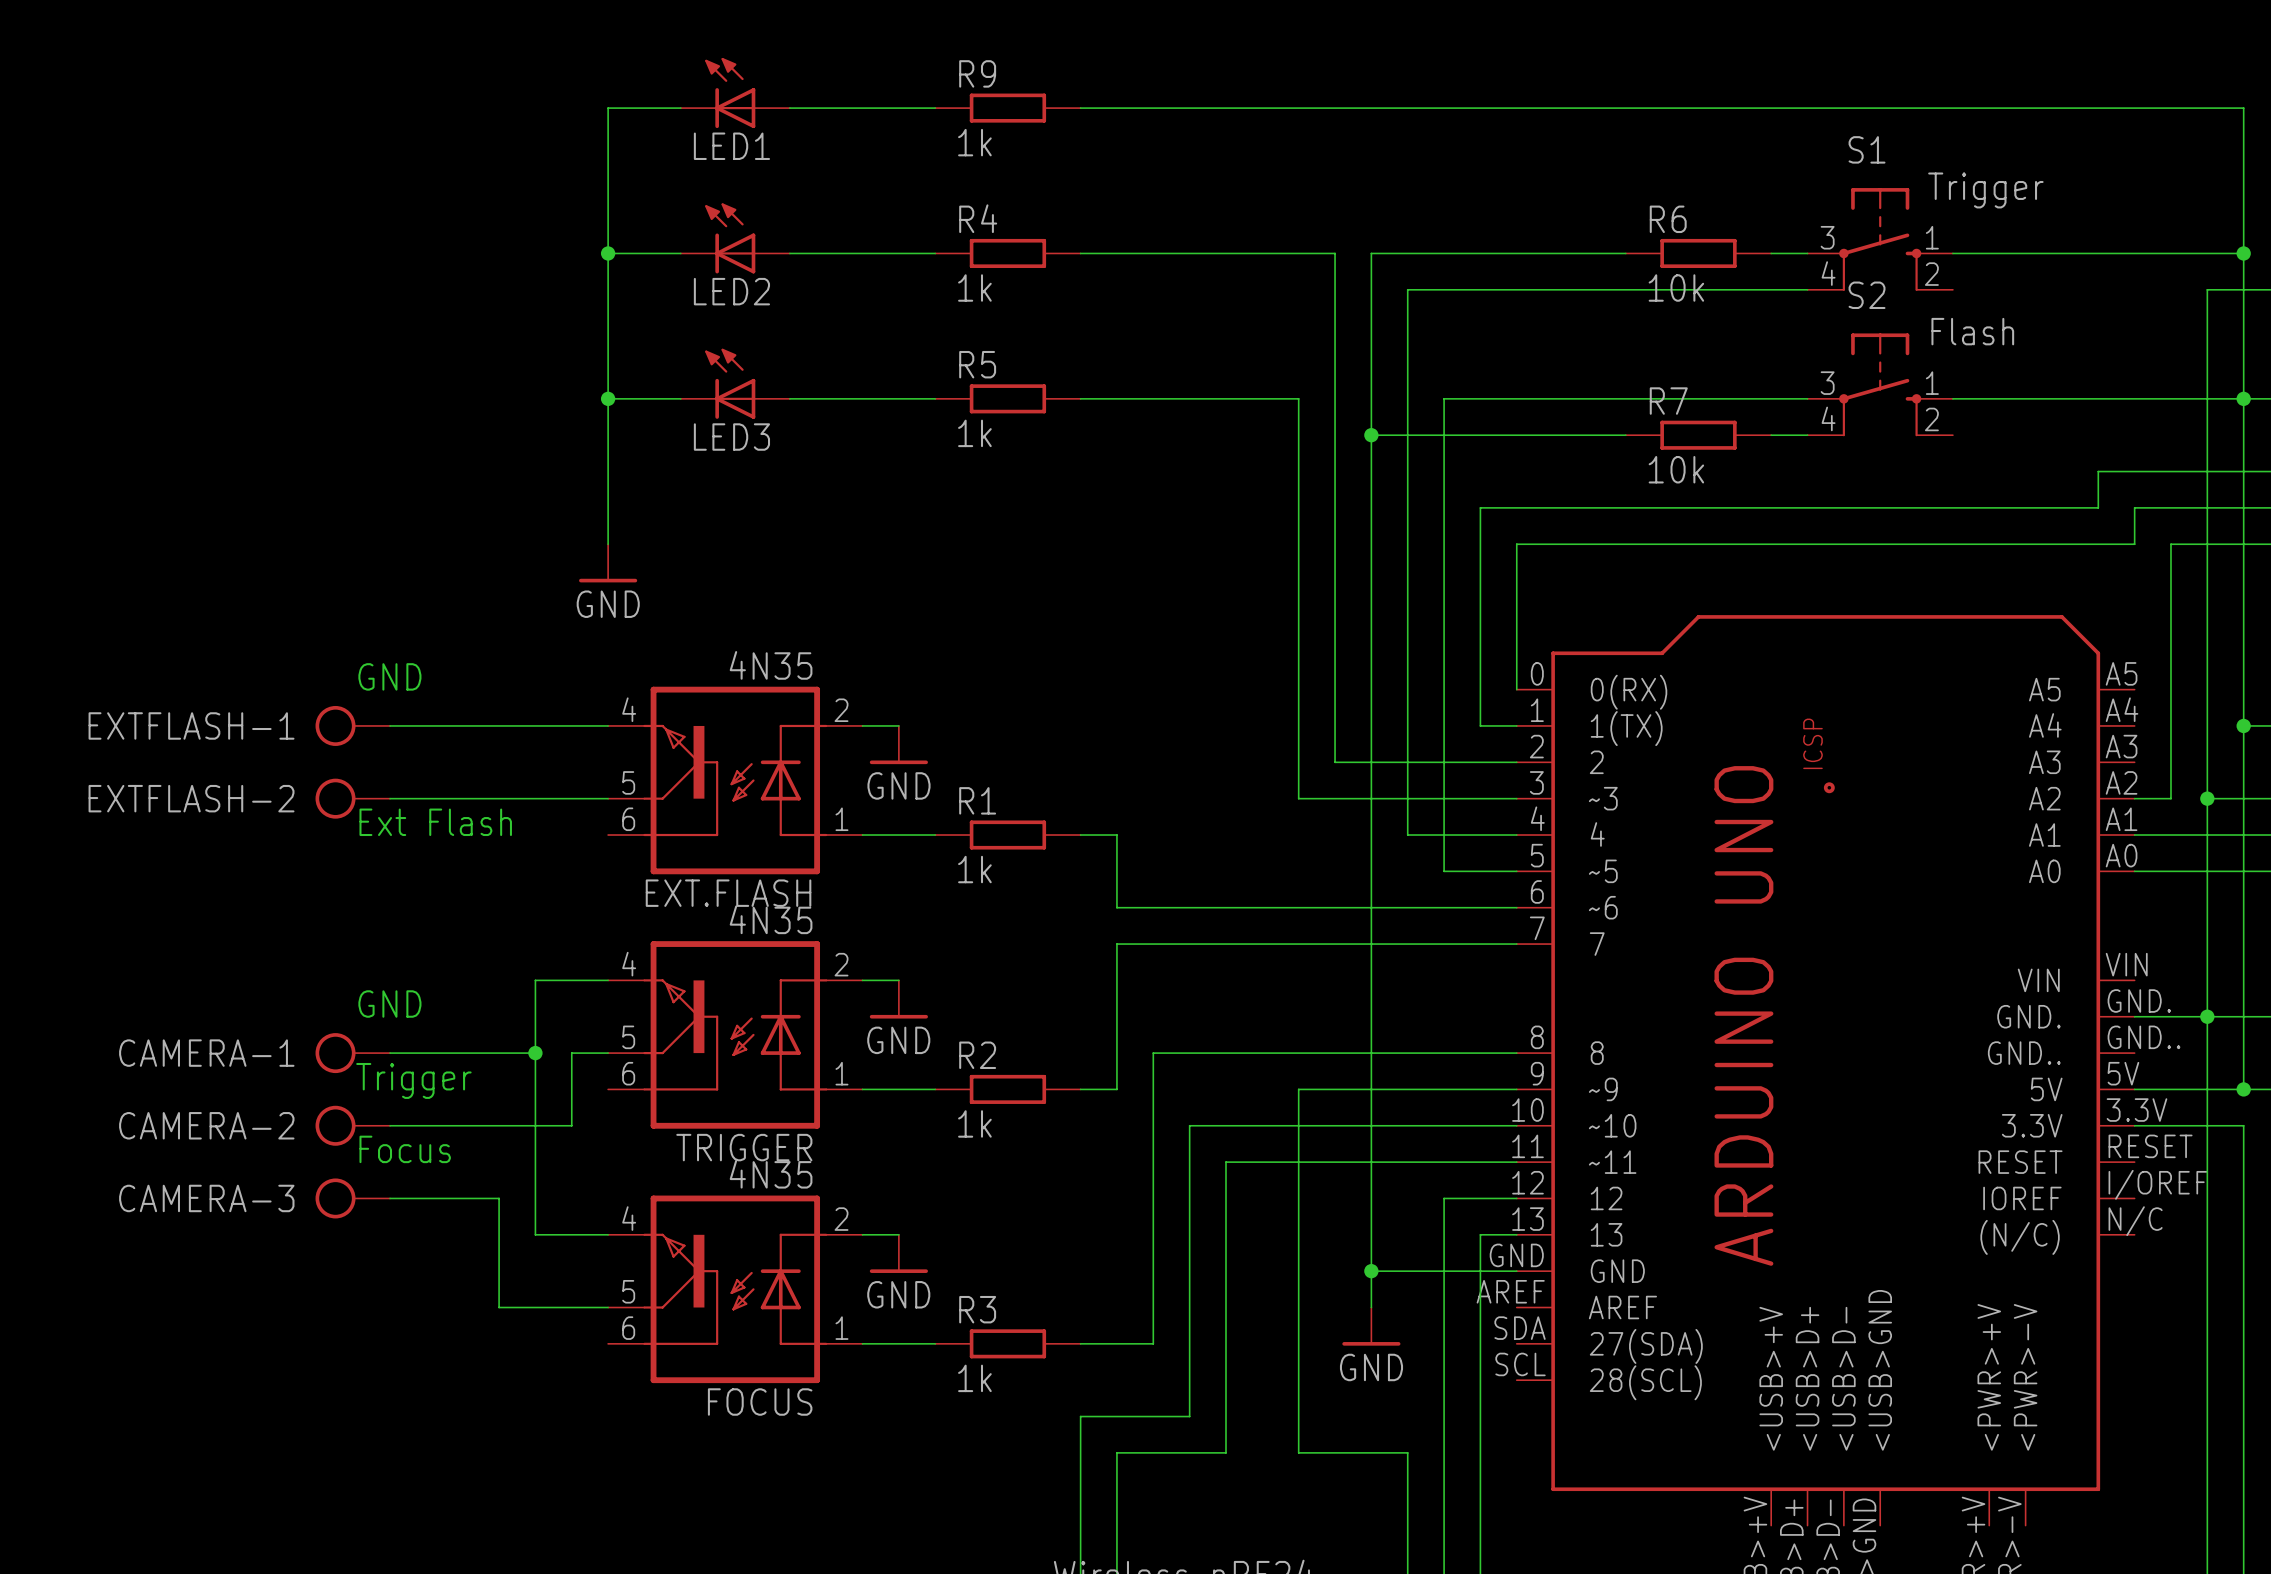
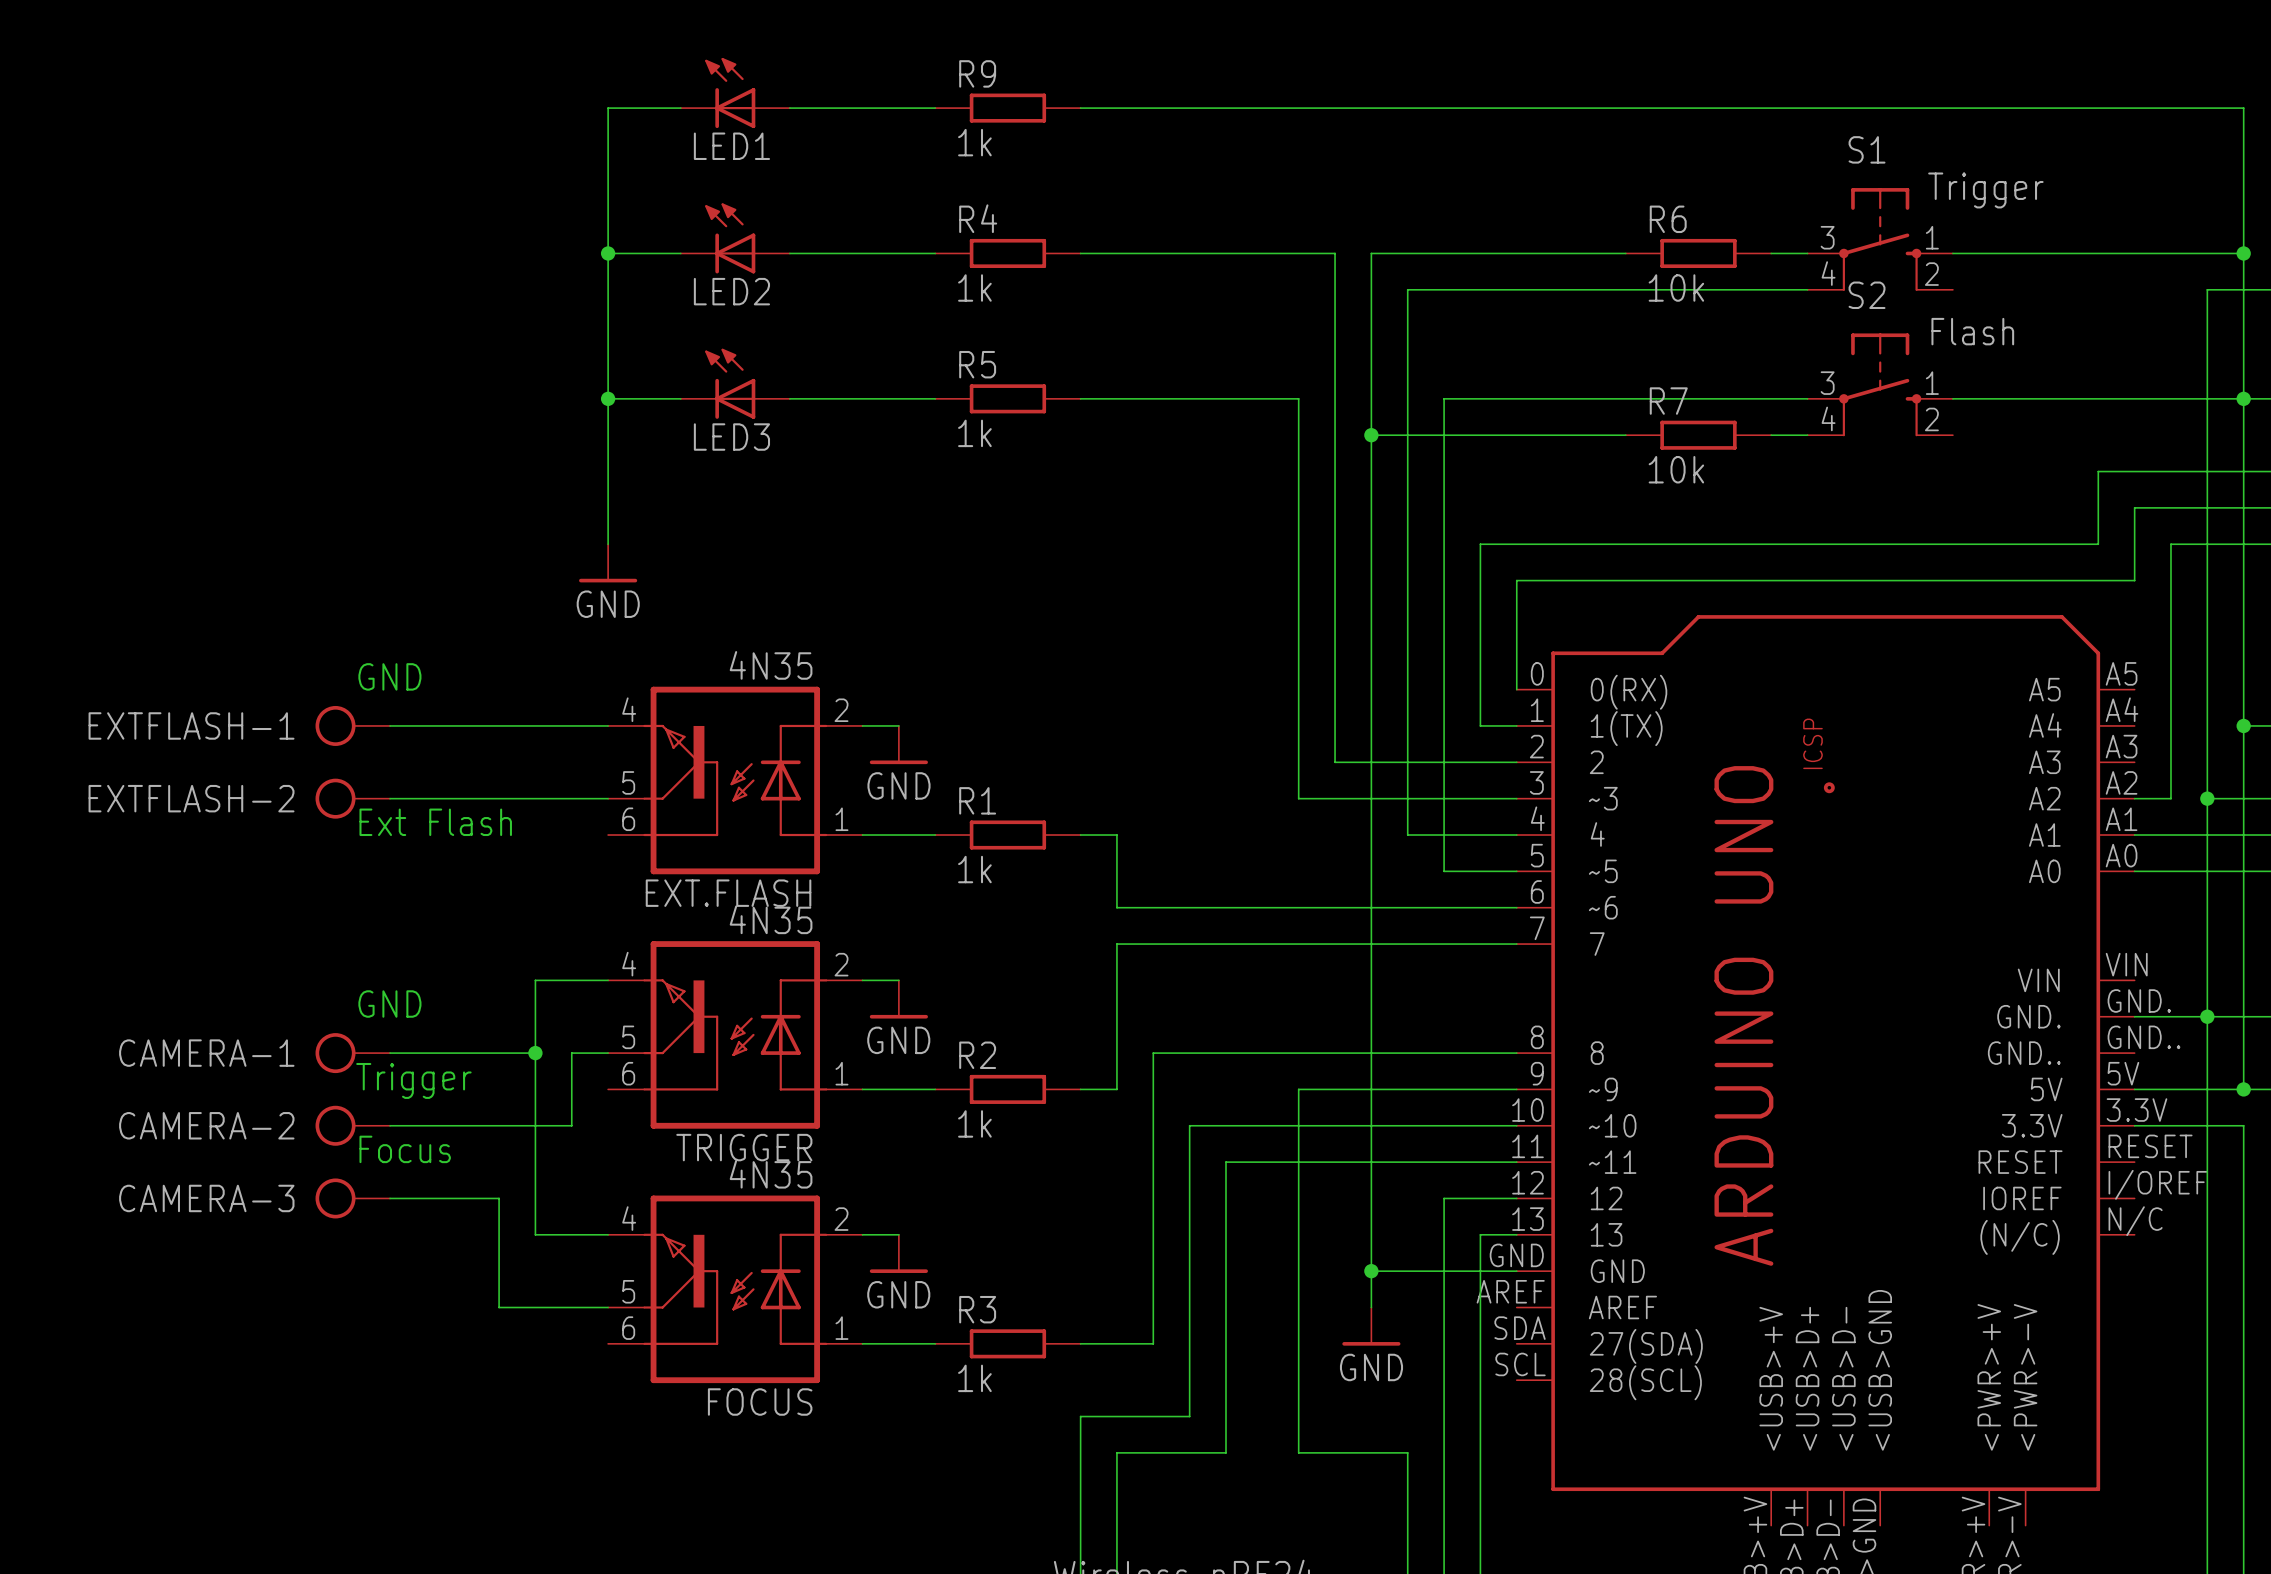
wire: (2098, 507) (1480, 507) (1480, 544) -> none
wire: (1516, 544) (1516, 580) -> (1516, 544) (1480, 544)
wire: (2098, 544) (2134, 544) -> (2098, 544) (2098, 507)
wire: none -> (2134, 544) (2134, 580) (1516, 580)

